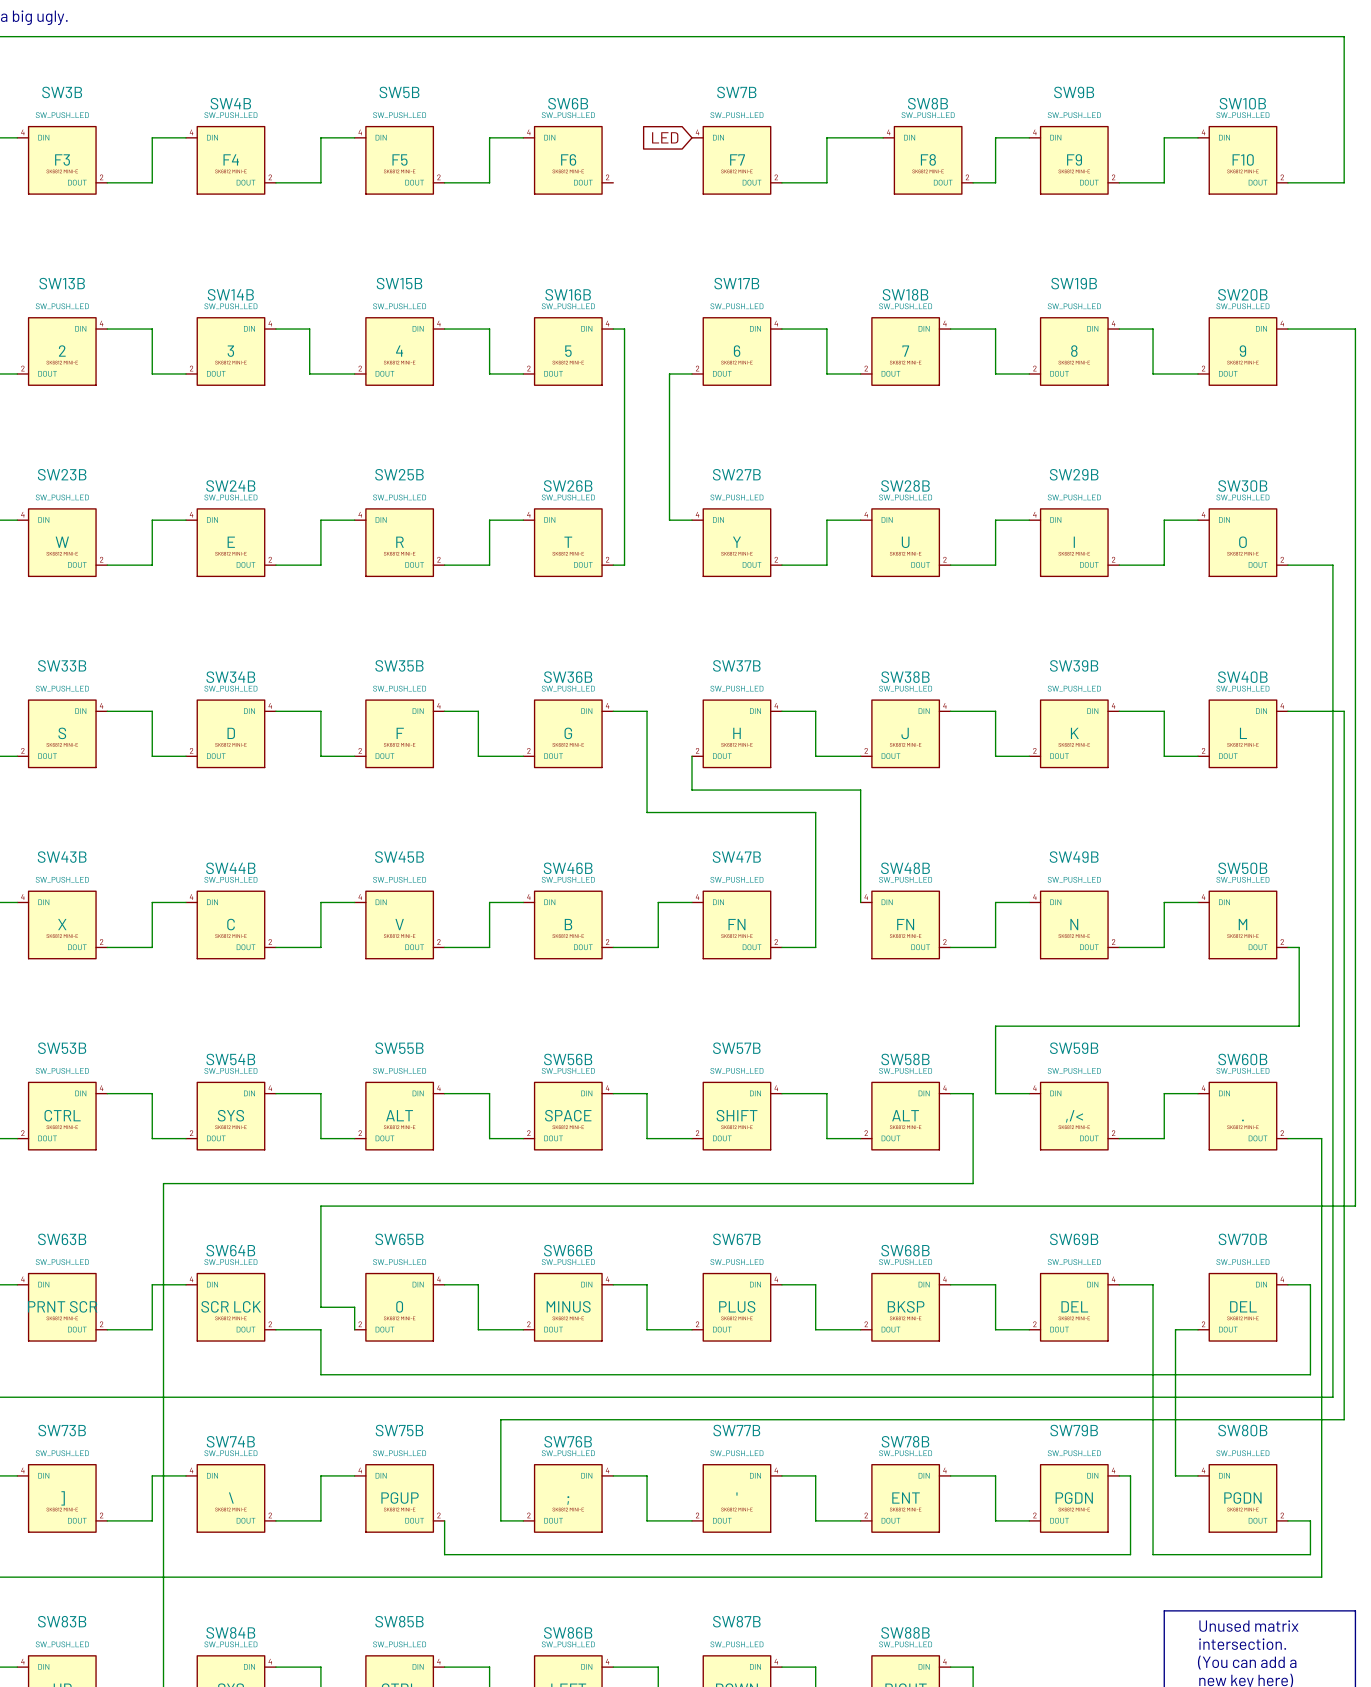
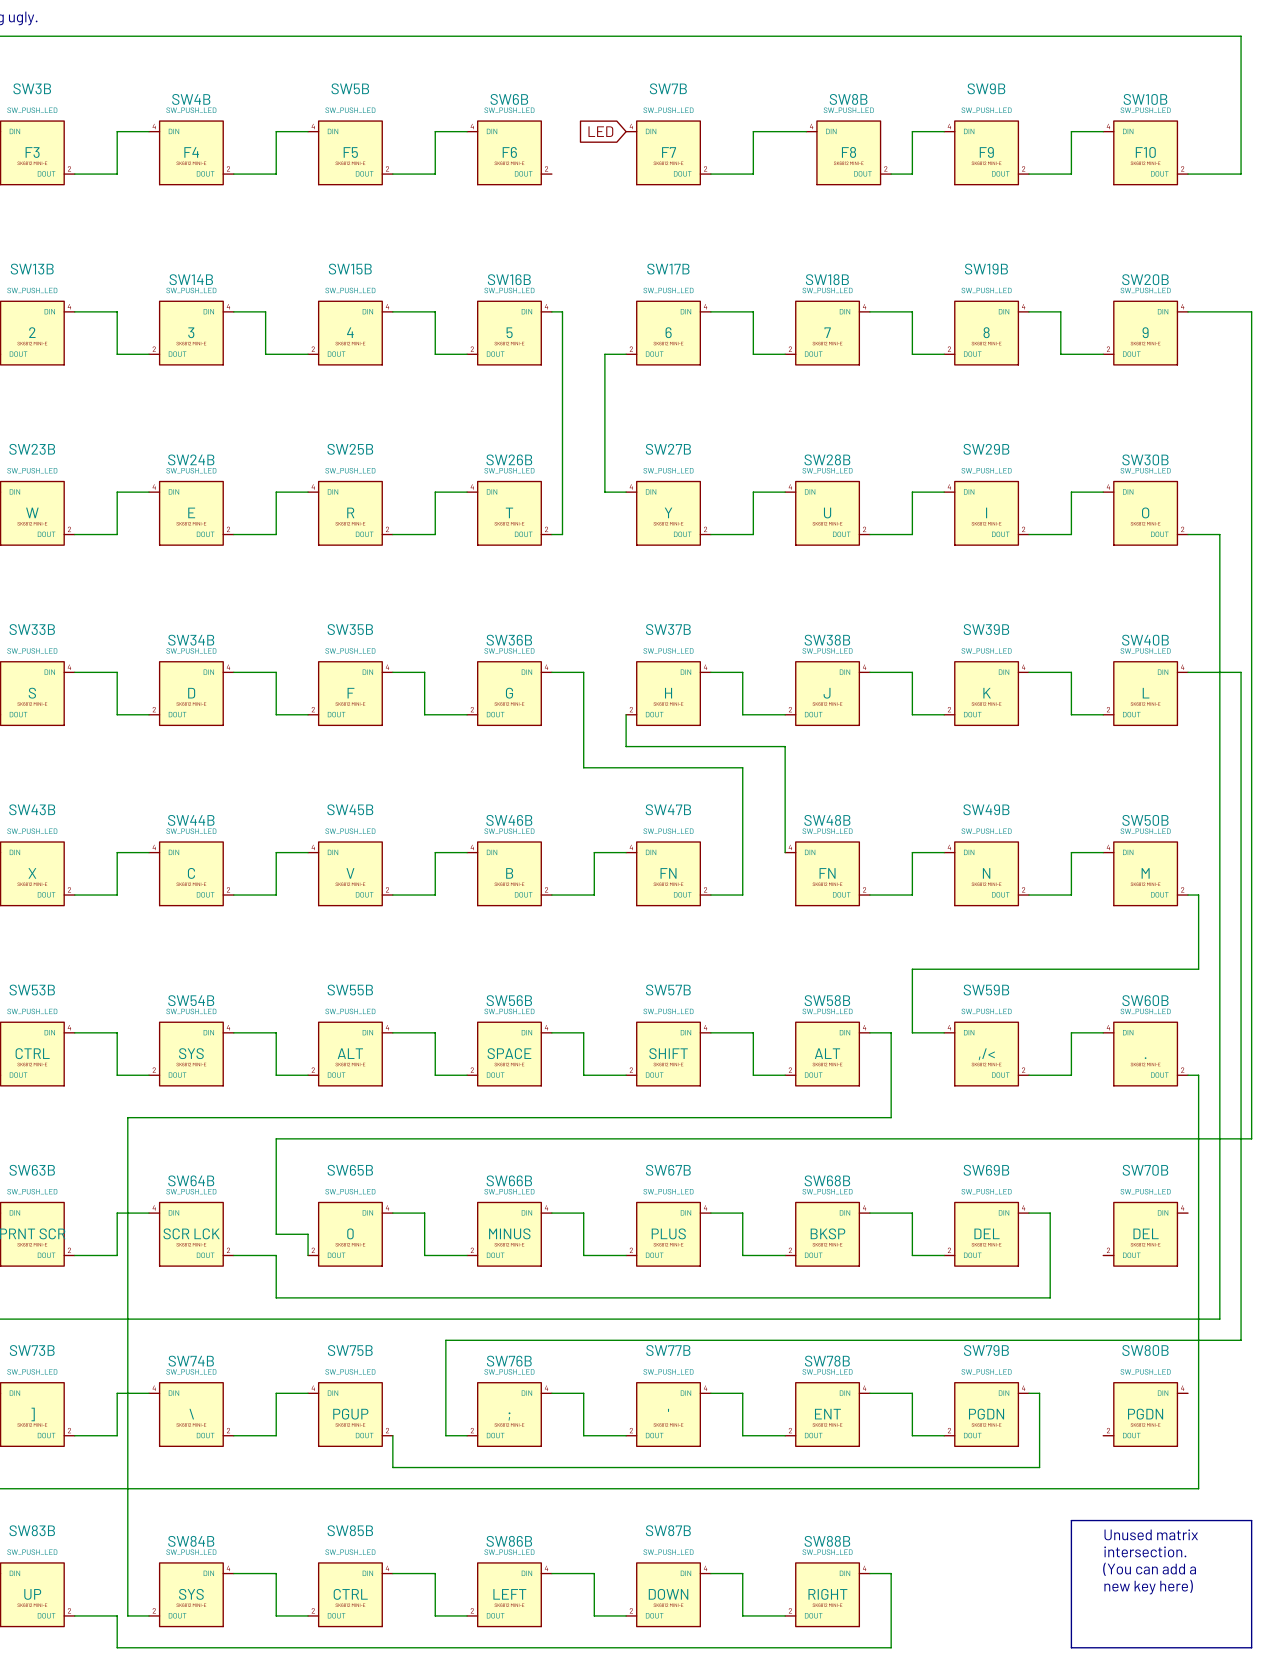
wire: (1321, 565) (1332, 565) (1332, 1397) (1321, 1397) (1321, 1577) (1299, 1577) -> (1219, 534) (1219, 1075)
wire: (1299, 1138) (1321, 1138) -> (1198, 1075) (1198, 1488)
wire: (1141, 1284) (1153, 1284) (1153, 1554) (1310, 1554) (1310, 1520) (1287, 1520) -> none
wire: (1287, 1284) (1310, 1284) (1310, 1374) (1141, 1374) -> (1050, 1213) (1050, 1297)
wire: (1198, 1329) (1175, 1329) (1175, 1475) (1198, 1475) -> none
SW80B flip: as is (1242, 1498) -> left-right (1145, 1414)

